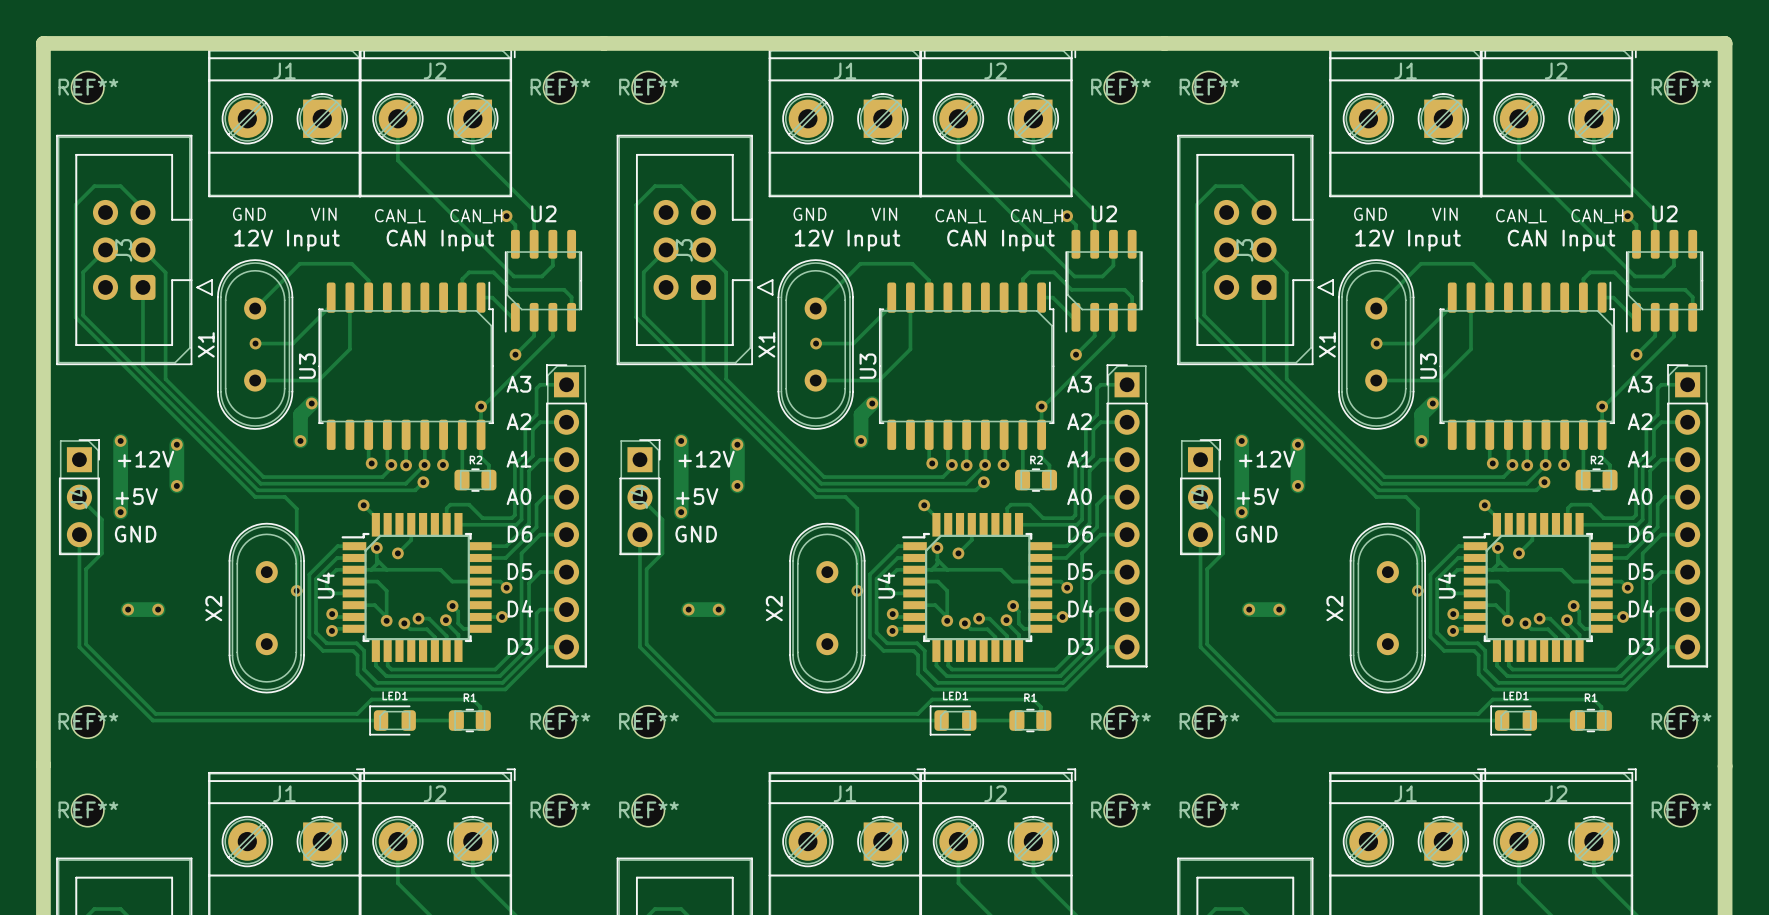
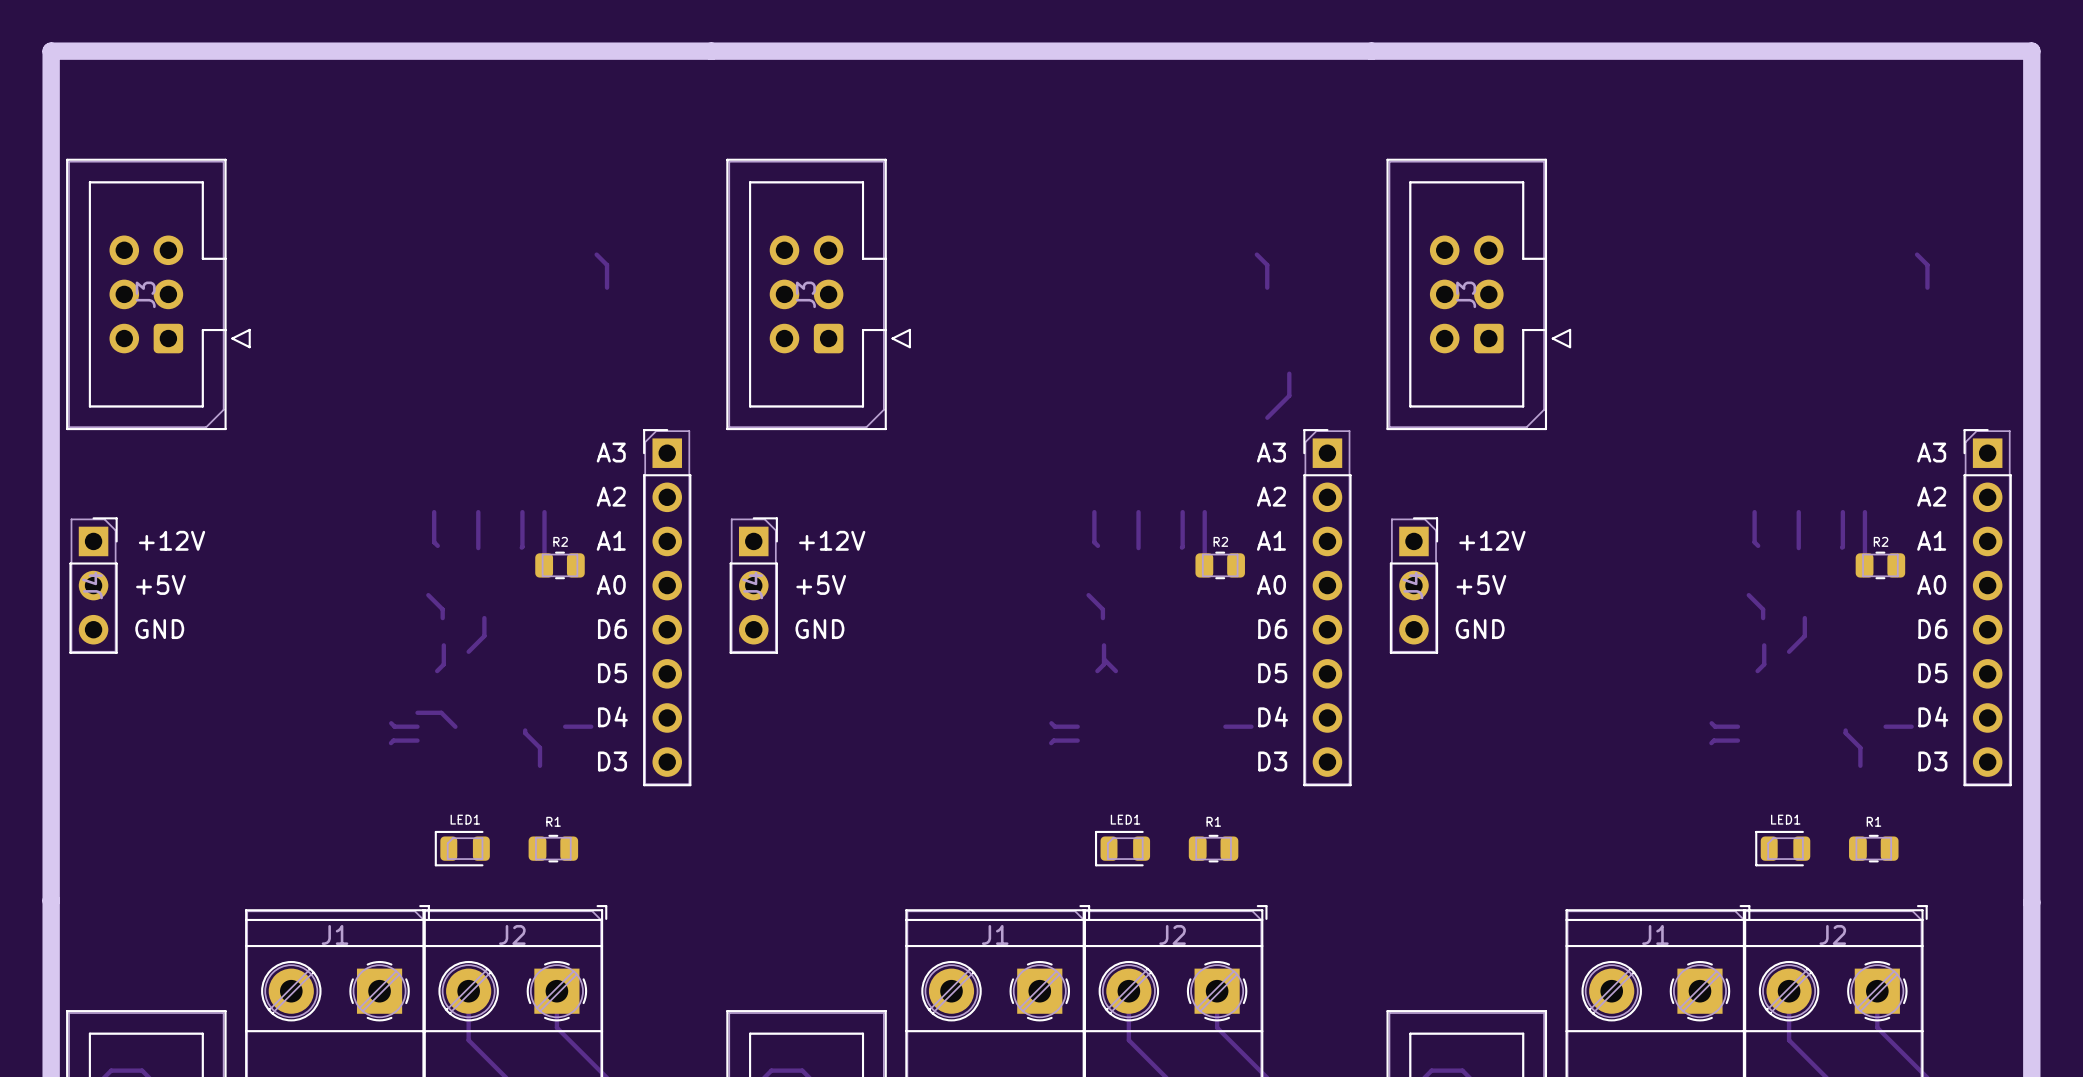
REF**: (87, 87) -> none
REF**: (559, 87) -> none
REF**: (648, 87) -> none
REF**: (1120, 87) -> none
REF**: (1208, 87) -> none
REF**: (1680, 87) -> none
track: (397, 118) (397, 160) (514, 276) (542, 276) (552, 265) (552, 244) -> none
track: (472, 118) (472, 149) (534, 211) (534, 244) -> none
track: (958, 118) (958, 160) (1074, 276) (1102, 276) (1113, 265) (1113, 244) -> none
track: (1033, 118) (1033, 149) (1094, 211) (1094, 244) -> none
track: (1519, 118) (1519, 160) (1635, 276) (1663, 276) (1673, 265) (1673, 244) -> none
track: (1593, 118) (1593, 149) (1655, 211) (1655, 244) -> none
J1: (286, 121) -> none
J2: (437, 121) -> none
J1: (847, 121) -> none
J2: (997, 121) -> none
J1: (1407, 121) -> none
J2: (1558, 121) -> none
track: (142, 212) (142, 208) (120, 186) (94, 186) (75, 204) (75, 317) (255, 496) (284, 496) (296, 508) (296, 590) -> none
track: (703, 212) (703, 208) (681, 186) (654, 186) (636, 204) (636, 317) (815, 496) (845, 496) (857, 508) (857, 590) -> none
track: (1264, 212) (1264, 208) (1241, 186) (1215, 186) (1196, 204) (1196, 317) (1376, 496) (1406, 496) (1417, 508) (1417, 590) -> none
text: GND (249, 214) -> none
text: VIN (323, 214) -> none
text: GND (809, 214) -> none
text: VIN (884, 214) -> none
text: GND (1370, 214) -> none
text: VIN (1444, 214) -> none
text: CAN_L (400, 216) -> none
text: CAN_H (476, 216) -> none
via: (506, 216) -> none
text: CAN_L (960, 216) -> none
text: CAN_H (1036, 216) -> none
via: (1067, 216) -> none
text: CAN_L (1521, 216) -> none
text: CAN_H (1597, 216) -> none
via: (1627, 216) -> none
text: 12V Input (287, 240) -> none
text: CAN Input (440, 240) -> none
text: 12V Input (847, 240) -> none
text: CAN Input (1000, 240) -> none
text: 12V Input (1408, 240) -> none
text: CAN Input (1561, 240) -> none
track: (105, 249) (83, 272) (83, 315) (258, 490) (415, 490) (423, 482) -> none
track: (142, 249) (165, 272) (165, 379) (263, 477) (382, 477) (391, 468) (391, 464) (387, 461) (387, 434) -> none
track: (666, 249) (643, 272) (643, 315) (818, 490) (975, 490) (983, 482) -> none
track: (703, 249) (726, 272) (726, 379) (824, 477) (942, 477) (951, 468) (951, 464) (947, 461) (947, 434) -> none
track: (1226, 249) (1204, 272) (1204, 315) (1379, 490) (1536, 490) (1544, 482) -> none
track: (1264, 249) (1286, 272) (1286, 379) (1384, 477) (1503, 477) (1512, 468) (1512, 464) (1508, 461) (1508, 434) -> none
U2: (543, 281) -> none
U2: (1104, 281) -> none
U2: (1664, 281) -> none
track: (142, 287) (142, 365) (260, 483) (405, 483) (424, 464) (424, 434) -> none
track: (703, 287) (703, 365) (821, 483) (966, 483) (985, 464) (985, 434) -> none
track: (1264, 287) (1264, 365) (1381, 483) (1526, 483) (1545, 464) (1545, 434) -> none
track: (331, 297) (331, 305) (293, 343) (255, 343) -> none
track: (349, 297) (349, 349) (318, 380) (255, 380) -> none
track: (368, 297) (368, 280) (351, 263) (299, 263) (255, 308) -> none
track: (462, 297) (462, 279) (469, 272) (493, 272) (511, 289) (564, 289) (571, 297) (571, 317) -> none
track: (481, 297) (492, 297) (512, 317) (515, 317) -> none
track: (891, 297) (891, 305) (853, 343) (816, 343) -> none
track: (910, 297) (910, 349) (879, 380) (815, 380) -> none
track: (929, 297) (929, 280) (912, 263) (860, 263) (815, 308) -> none
track: (1022, 297) (1022, 279) (1029, 272) (1054, 272) (1071, 289) (1124, 289) (1132, 297) (1132, 317) -> none
track: (1041, 297) (1052, 297) (1072, 317) (1075, 317) -> none
track: (1452, 297) (1452, 305) (1414, 343) (1376, 343) -> none
track: (1471, 297) (1471, 349) (1439, 380) (1376, 380) -> none
track: (1489, 297) (1489, 280) (1472, 263) (1421, 263) (1376, 308) -> none
track: (1583, 297) (1583, 279) (1590, 272) (1614, 272) (1632, 289) (1685, 289) (1692, 297) (1692, 317) -> none
track: (1602, 297) (1613, 297) (1633, 317) (1636, 317) -> none
track: (534, 317) (534, 336) (515, 354) -> none
track: (552, 317) (552, 336) (481, 406) (481, 457) (488, 465) (488, 480) -> none
track: (1113, 317) (1113, 336) (1041, 406) (1041, 457) (1049, 465) (1049, 480) -> none
track: (1655, 317) (1655, 336) (1636, 354) -> none
track: (1673, 317) (1673, 336) (1602, 406) (1602, 457) (1610, 465) (1610, 480) -> none
via: (255, 343) -> none
via: (816, 343) -> none
via: (1376, 343) -> none
X1: (255, 344) -> none
X1: (815, 344) -> none
X1: (1376, 344) -> none
via: (515, 354) -> none
via: (1076, 354) -> none
via: (1636, 354) -> none
U3: (406, 365) -> none
U3: (966, 365) -> none
U3: (1527, 365) -> none
track: (566, 384) (540, 384) (536, 388) (536, 414) (525, 425) (525, 454) (514, 464) (514, 515) (511, 518) (482, 518) (469, 504) (450, 504) (446, 508) (446, 524) -> none
track: (1127, 384) (1100, 384) (1097, 388) (1097, 414) (1085, 425) (1085, 454) (1075, 464) (1075, 515) (1072, 518) (1043, 518) (1029, 504) (1010, 504) (1007, 508) (1007, 524) -> none
track: (1687, 384) (1661, 384) (1657, 388) (1657, 414) (1646, 425) (1646, 454) (1636, 464) (1636, 515) (1632, 518) (1603, 518) (1590, 504) (1571, 504) (1567, 508) (1567, 524) -> none
track: (311, 403) (300, 414) (300, 440) -> none
via: (311, 403) -> none
track: (872, 403) (861, 414) (861, 440) -> none
via: (872, 403) -> none
track: (1432, 403) (1421, 414) (1421, 440) -> none
via: (1432, 403) -> none
via: (481, 406) -> none
via: (1041, 406) -> none
via: (1602, 406) -> none
track: (566, 422) (540, 422) (532, 429) (532, 455) (521, 467) (521, 519) (516, 524) (458, 524) -> none
track: (1127, 422) (1100, 422) (1093, 429) (1093, 455) (1082, 467) (1082, 519) (1076, 524) (1019, 524) -> none
track: (1687, 422) (1661, 422) (1653, 429) (1653, 455) (1642, 467) (1642, 519) (1637, 524) (1579, 524) -> none
track: (120, 440) (120, 512) -> none
via: (120, 440) -> none
via: (300, 440) -> none
track: (681, 440) (681, 512) -> none
via: (681, 440) -> none
via: (861, 440) -> none
track: (1241, 440) (1241, 512) -> none
via: (1241, 440) -> none
via: (1421, 440) -> none
track: (176, 444) (176, 485) -> none
via: (176, 444) -> none
track: (737, 444) (737, 485) -> none
via: (737, 444) -> none
track: (1297, 444) (1297, 485) -> none
via: (1297, 444) -> none
track: (566, 459) (540, 459) (529, 470) (529, 523) (506, 546) (479, 546) -> none
track: (1127, 459) (1100, 459) (1089, 470) (1089, 523) (1066, 546) (1040, 546) -> none
track: (1687, 459) (1661, 459) (1650, 470) (1650, 523) (1627, 546) (1600, 546) -> none
via: (371, 463) -> none
via: (932, 463) -> none
via: (1492, 463) -> none
via: (391, 464) -> none
via: (424, 464) -> none
via: (442, 464) -> none
via: (951, 464) -> none
via: (985, 464) -> none
via: (1003, 464) -> none
via: (1512, 464) -> none
via: (1545, 464) -> none
via: (1564, 464) -> none
via: (406, 465) -> none
via: (966, 465) -> none
via: (1527, 465) -> none
via: (423, 482) -> none
via: (983, 482) -> none
via: (1544, 482) -> none
via: (176, 485) -> none
via: (737, 485) -> none
via: (1297, 485) -> none
track: (79, 497) (101, 519) (101, 553) (86, 569) (86, 644) (155, 713) (357, 713) (371, 699) (472, 699) (480, 707) (480, 717) (483, 720) -> none
track: (566, 497) (544, 497) (536, 504) (536, 527) (505, 557) (479, 557) -> none
track: (639, 497) (662, 519) (662, 553) (646, 569) (646, 644) (716, 713) (917, 713) (932, 699) (1033, 699) (1040, 707) (1040, 717) (1043, 720) -> none
track: (1127, 497) (1104, 497) (1097, 504) (1097, 527) (1066, 557) (1040, 557) -> none
track: (1200, 497) (1223, 519) (1223, 553) (1207, 569) (1207, 644) (1276, 713) (1478, 713) (1492, 699) (1593, 699) (1601, 707) (1601, 717) (1604, 720) -> none
track: (1687, 497) (1665, 497) (1657, 504) (1657, 527) (1626, 557) (1600, 557) -> none
via: (363, 505) -> none
via: (924, 505) -> none
via: (1484, 505) -> none
via: (120, 512) -> none
via: (681, 512) -> none
via: (1241, 512) -> none
track: (971, 524) (971, 540) (958, 553) -> none
track: (79, 534) (79, 647) (152, 720) (381, 720) -> none
track: (566, 534) (540, 534) (521, 553) (521, 643) (495, 669) (391, 669) (387, 665) (387, 650) -> none
track: (639, 534) (639, 647) (713, 720) (941, 720) -> none
track: (1127, 534) (1100, 534) (1082, 553) (1082, 643) (1055, 669) (952, 669) (948, 665) (948, 650) -> none
track: (1200, 534) (1200, 647) (1273, 720) (1502, 720) -> none
track: (1687, 534) (1661, 534) (1642, 553) (1642, 643) (1616, 669) (1512, 669) (1508, 665) (1508, 650) -> none
track: (354, 546) (337, 546) (309, 574) (309, 637) (322, 650) (352, 650) (357, 655) (357, 674) (372, 689) (505, 689) (547, 647) (566, 647) -> none
track: (915, 546) (898, 546) (869, 574) (869, 637) (883, 650) (913, 650) (918, 655) (918, 674) (933, 689) (1065, 689) (1108, 647) (1127, 647) -> none
track: (1475, 546) (1458, 546) (1430, 574) (1430, 637) (1444, 650) (1474, 650) (1478, 655) (1478, 674) (1493, 689) (1626, 689) (1668, 647) (1687, 647) -> none
via: (376, 547) -> none
via: (937, 547) -> none
via: (1497, 547) -> none
via: (397, 553) -> none
via: (958, 553) -> none
via: (1519, 553) -> none
track: (354, 557) (337, 557) (316, 579) (316, 632) (326, 643) (356, 643) (364, 650) (364, 669) (377, 682) (502, 682) (536, 648) (536, 613) (540, 609) (566, 609) -> none
track: (915, 557) (897, 557) (876, 579) (876, 632) (887, 643) (917, 643) (924, 650) (924, 669) (938, 682) (1063, 682) (1097, 648) (1097, 613) (1100, 609) (1127, 609) -> none
track: (1475, 557) (1458, 557) (1437, 579) (1437, 632) (1447, 643) (1477, 643) (1485, 650) (1485, 669) (1498, 682) (1623, 682) (1657, 648) (1657, 613) (1661, 609) (1687, 609) -> none
track: (376, 559) (386, 569) -> none
track: (1497, 559) (1507, 569) -> none
track: (566, 572) (540, 572) (529, 583) (529, 647) (499, 676) (386, 676) (375, 665) (375, 650) -> none
track: (1127, 572) (1100, 572) (1089, 583) (1089, 647) (1060, 676) (946, 676) (936, 665) (936, 650) -> none
track: (1687, 572) (1661, 572) (1650, 583) (1650, 647) (1620, 676) (1507, 676) (1496, 665) (1496, 650) -> none
track: (354, 581) (377, 581) (386, 590) (386, 620) -> none
track: (915, 581) (937, 581) (947, 590) (947, 620) -> none
track: (1475, 581) (1498, 581) (1507, 590) (1507, 620) -> none
U4: (416, 587) -> none
track: (506, 587) (500, 581) (452, 581) (440, 569) (336, 569) (326, 579) (326, 587) (333, 593) (354, 593) -> none
via: (506, 587) -> none
U4: (977, 587) -> none
track: (1067, 587) (1061, 581) (1012, 581) (1001, 569) (897, 569) (887, 579) (887, 587) (893, 593) (915, 593) -> none
via: (1067, 587) -> none
U4: (1537, 587) -> none
track: (1627, 587) (1621, 581) (1573, 581) (1561, 569) (1457, 569) (1447, 579) (1447, 587) (1454, 593) (1475, 593) -> none
via: (1627, 587) -> none
via: (296, 590) -> none
via: (857, 590) -> none
via: (1417, 590) -> none
track: (915, 605) (935, 605) (947, 617) -> none
track: (1475, 605) (1495, 605) (1507, 617) -> none
track: (452, 606) (458, 611) (458, 623) (463, 628) (479, 628) -> none
via: (452, 606) -> none
track: (1013, 606) (1018, 611) (1018, 623) (1024, 628) (1040, 628) -> none
via: (1013, 606) -> none
track: (1573, 606) (1579, 611) (1579, 623) (1584, 628) (1600, 628) -> none
via: (1573, 606) -> none
X2: (266, 608) -> none
X2: (827, 608) -> none
X2: (1387, 608) -> none
track: (128, 609) (158, 609) -> none
via: (128, 609) -> none
via: (158, 609) -> none
track: (688, 609) (718, 609) -> none
via: (688, 609) -> none
via: (718, 609) -> none
track: (1249, 609) (1279, 609) -> none
via: (1249, 609) -> none
via: (1279, 609) -> none
via: (332, 614) -> none
via: (892, 614) -> none
via: (1453, 614) -> none
via: (501, 616) -> none
via: (1062, 616) -> none
via: (1623, 616) -> none
track: (418, 618) (429, 618) (446, 636) (446, 650) -> none
via: (418, 618) -> none
track: (979, 618) (989, 618) (1007, 636) (1007, 650) -> none
via: (979, 618) -> none
track: (1539, 618) (1550, 618) (1567, 636) (1567, 650) -> none
via: (1539, 618) -> none
via: (386, 620) -> none
via: (445, 620) -> none
via: (947, 620) -> none
track: (1006, 620) (1019, 634) (1019, 650) -> none
via: (1006, 620) -> none
via: (1507, 620) -> none
via: (1567, 620) -> none
track: (404, 623) (410, 629) (426, 629) (434, 637) (434, 650) -> none
via: (404, 623) -> none
track: (964, 623) (970, 629) (987, 629) (995, 637) (995, 650) -> none
via: (964, 623) -> none
track: (1525, 623) (1531, 629) (1548, 629) (1555, 637) (1555, 650) -> none
via: (1525, 623) -> none
via: (331, 630) -> none
via: (892, 630) -> none
via: (1453, 630) -> none
track: (408, 720) (456, 720) -> none
track: (969, 720) (1016, 720) -> none
track: (1529, 720) (1577, 720) -> none
REF**: (87, 721) -> none
REF**: (559, 721) -> none
REF**: (648, 721) -> none
REF**: (1120, 721) -> none
REF**: (1208, 721) -> none
REF**: (1680, 721) -> none
REF**: (87, 810) -> none
REF**: (559, 810) -> none
REF**: (648, 810) -> none
REF**: (1120, 810) -> none
REF**: (1208, 810) -> none
REF**: (1680, 810) -> none

